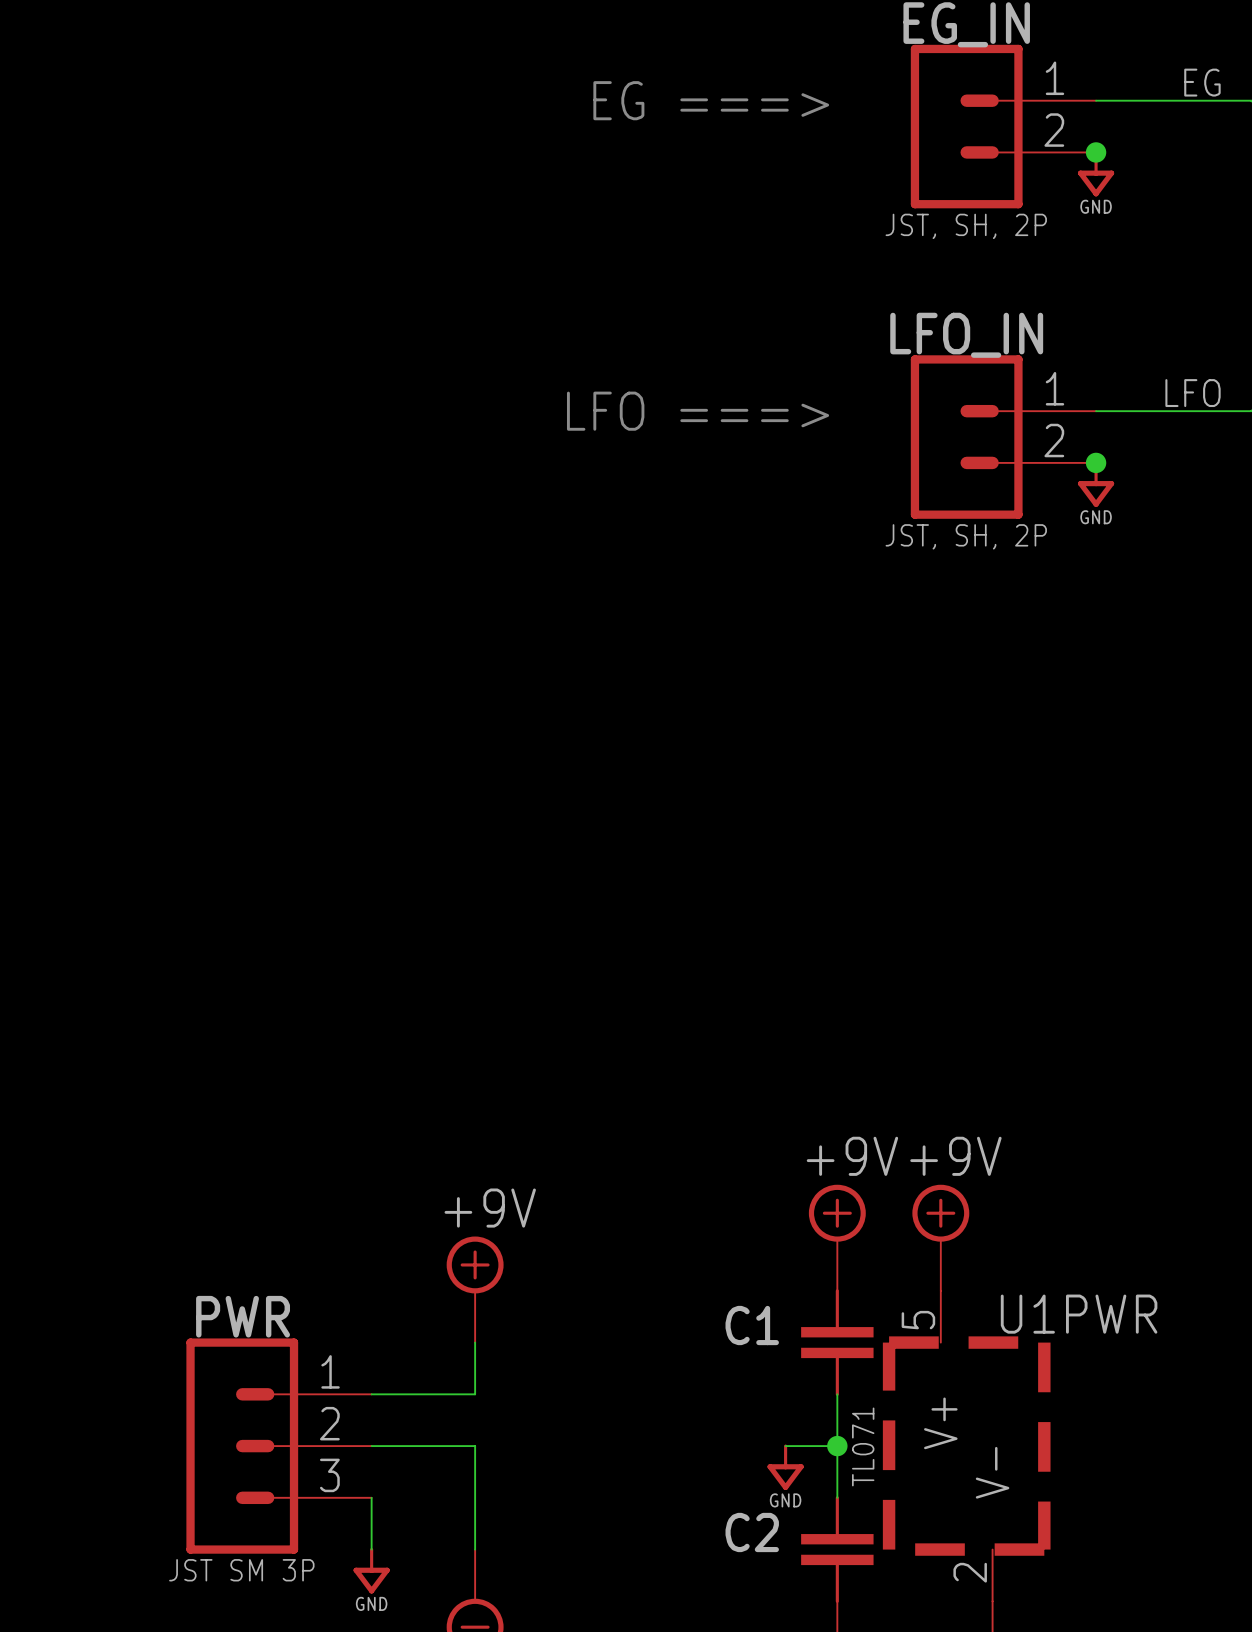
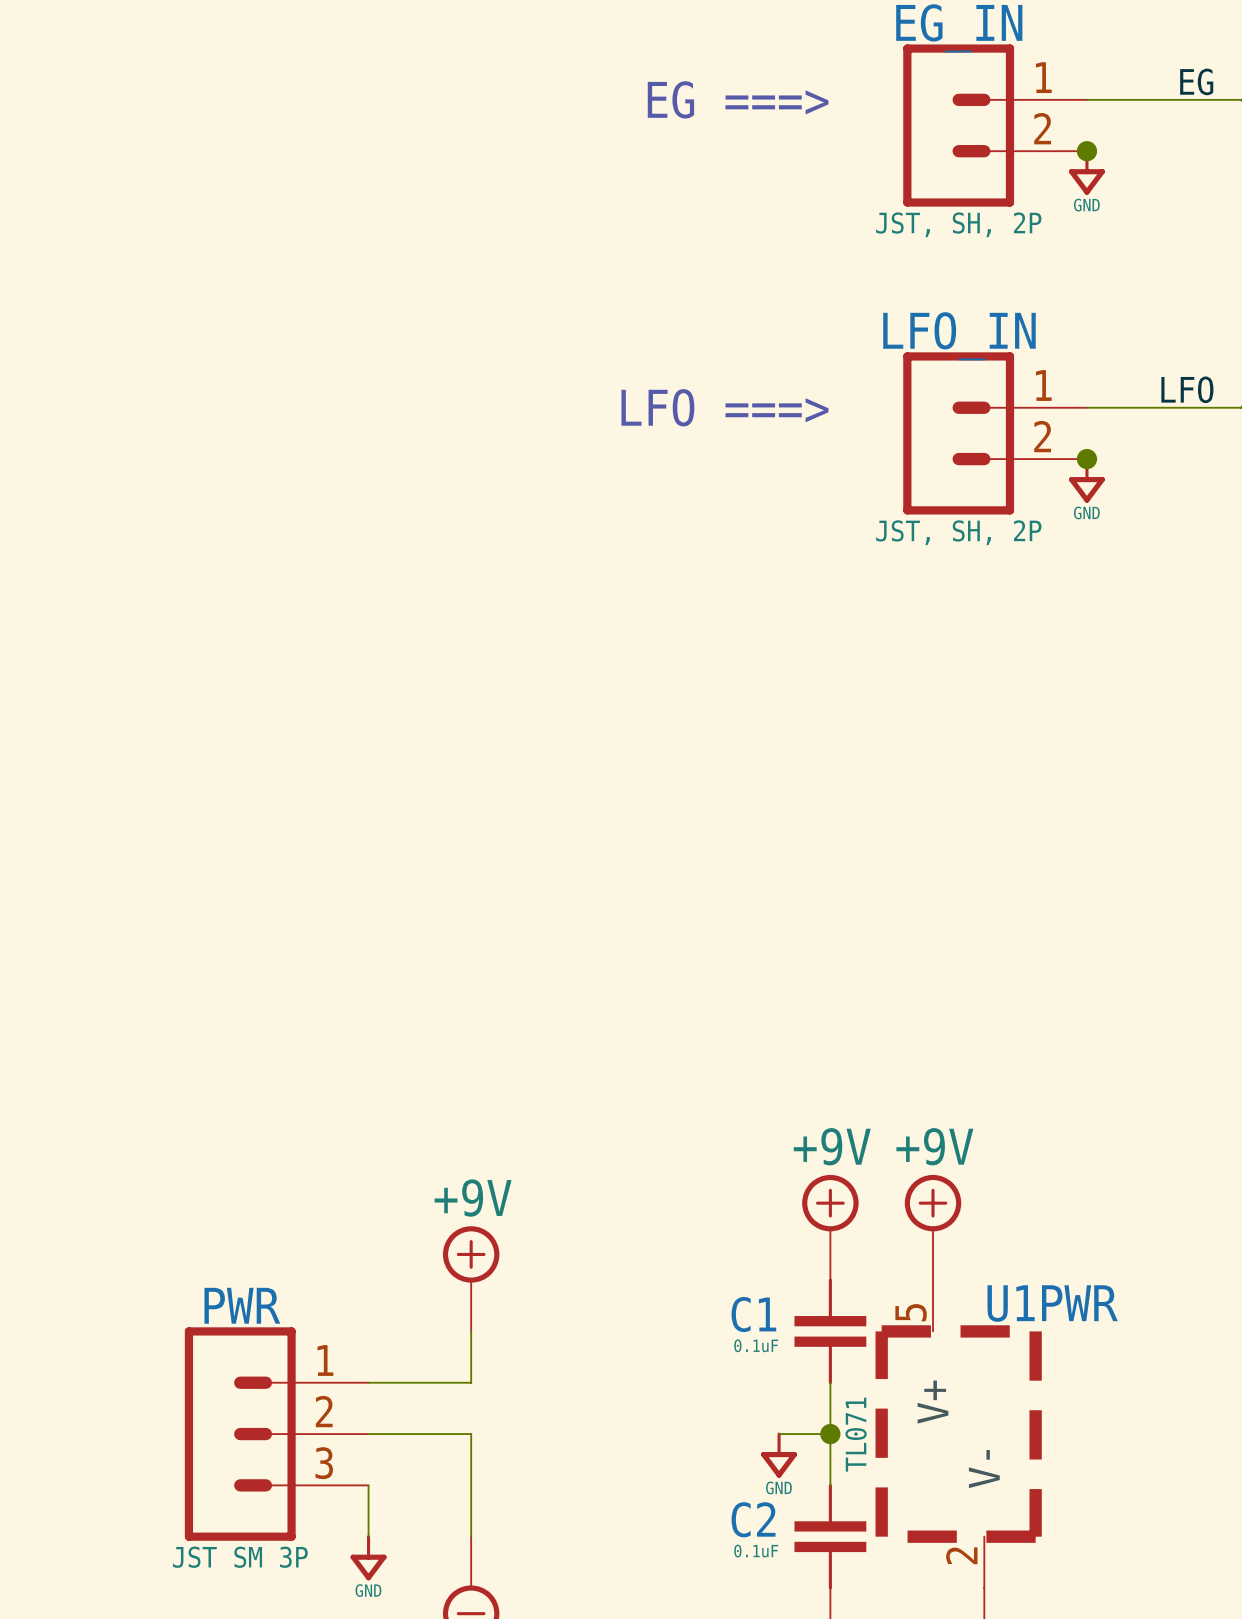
C1 value: none -> 0.1uF (756, 1345)
C2 value: none -> 0.1uF (756, 1551)

